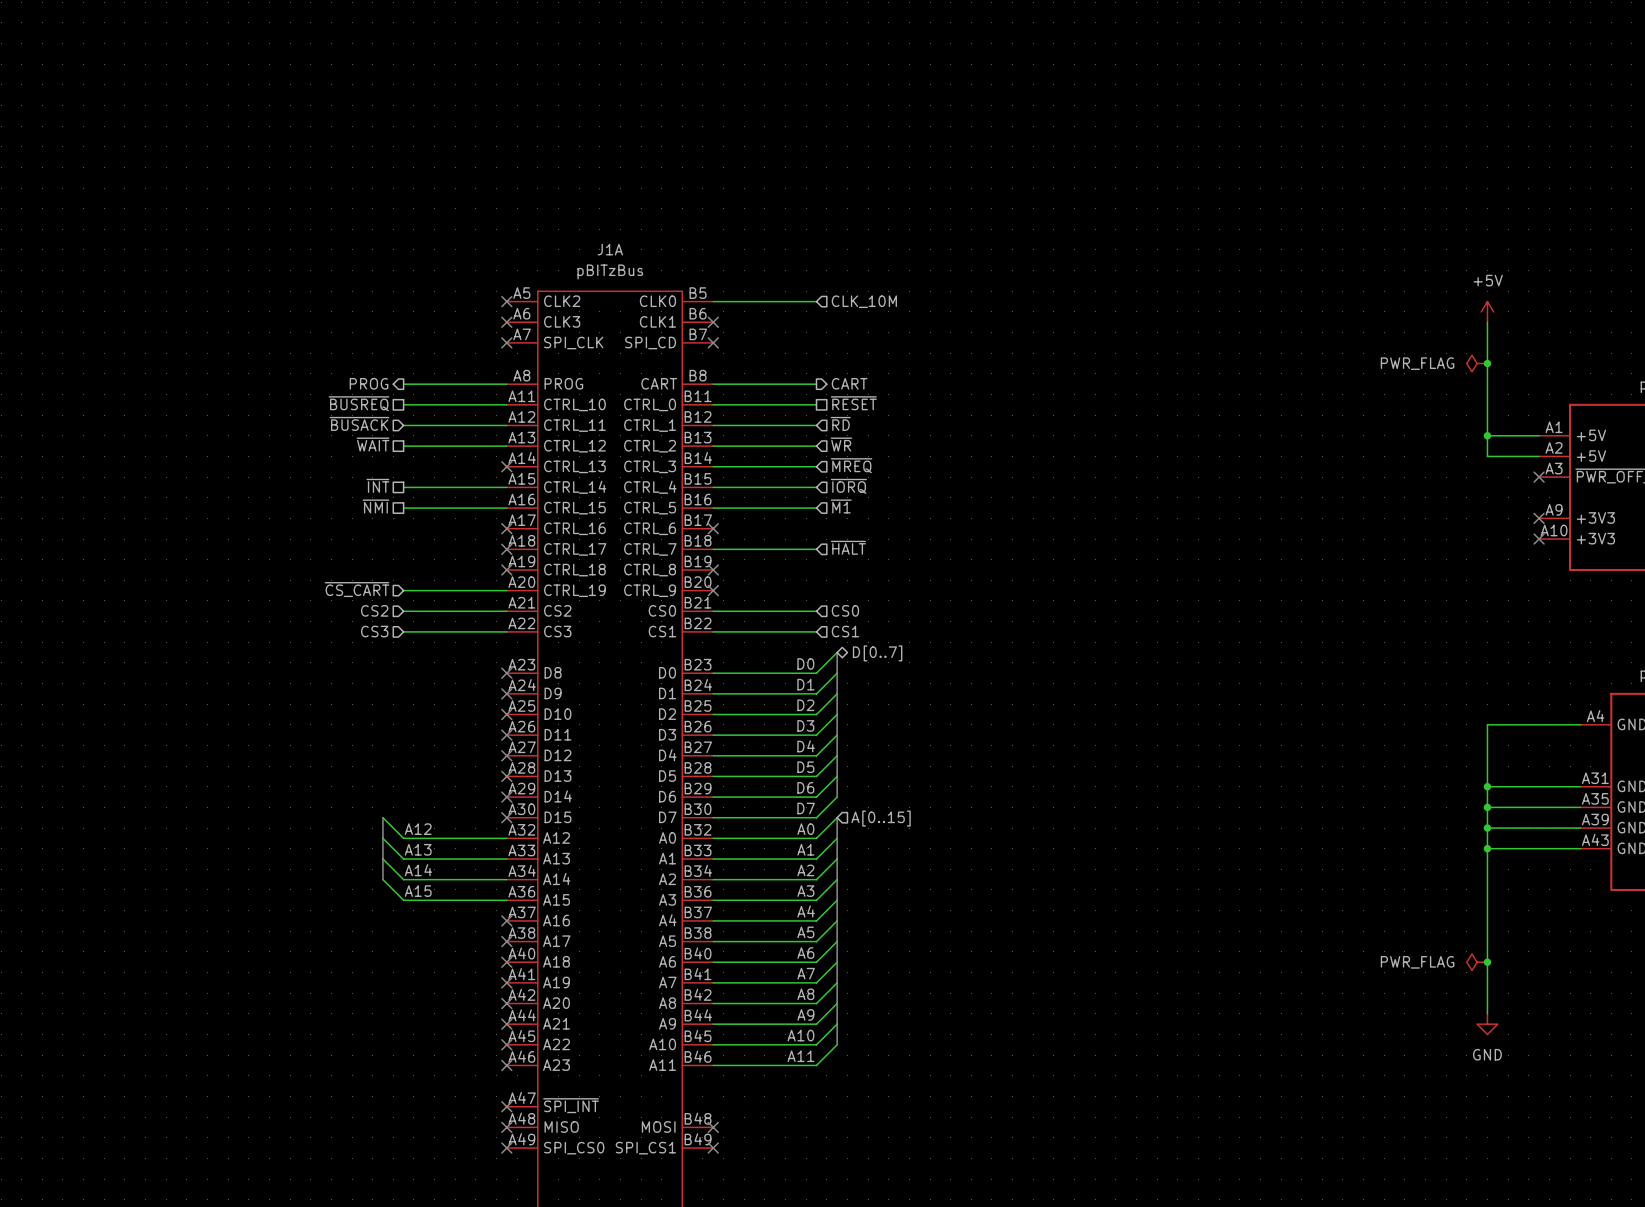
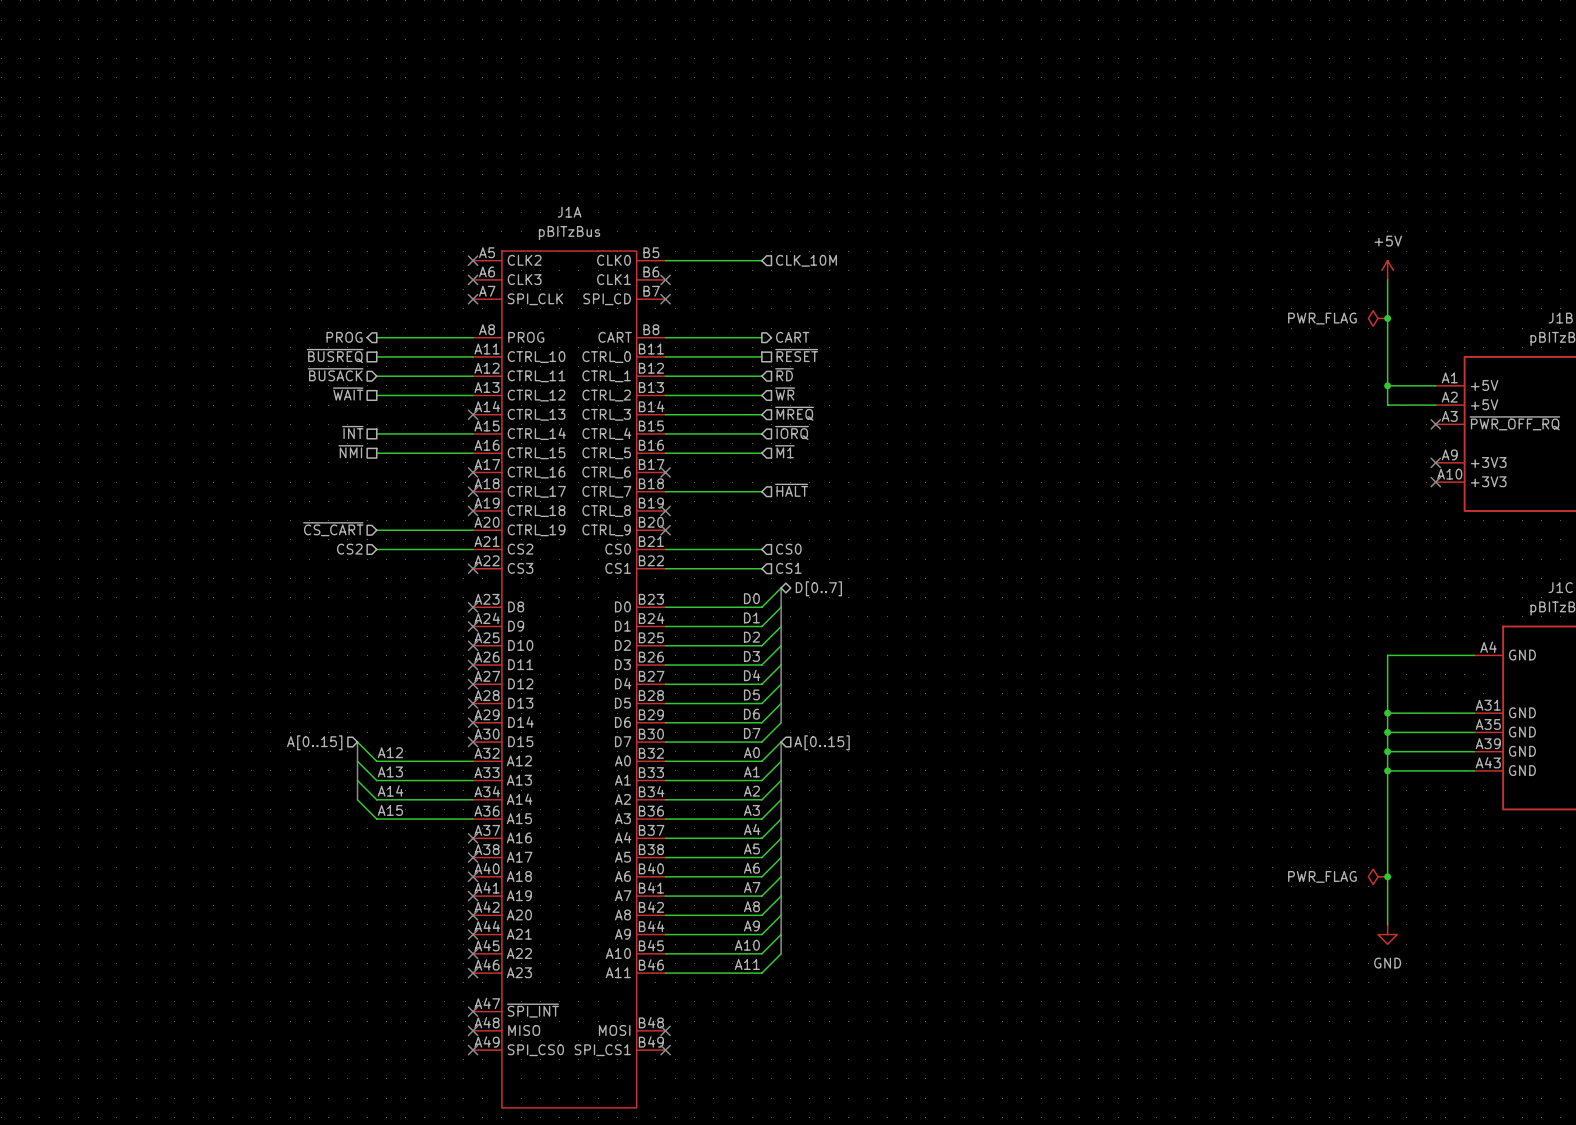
hierarchical label: CS3 (374, 631) -> none
wire: (403, 631) (506, 631) -> none
no-connect mark: none -> (473, 568)
hierarchical label: none -> A[0..15] (314, 742)

